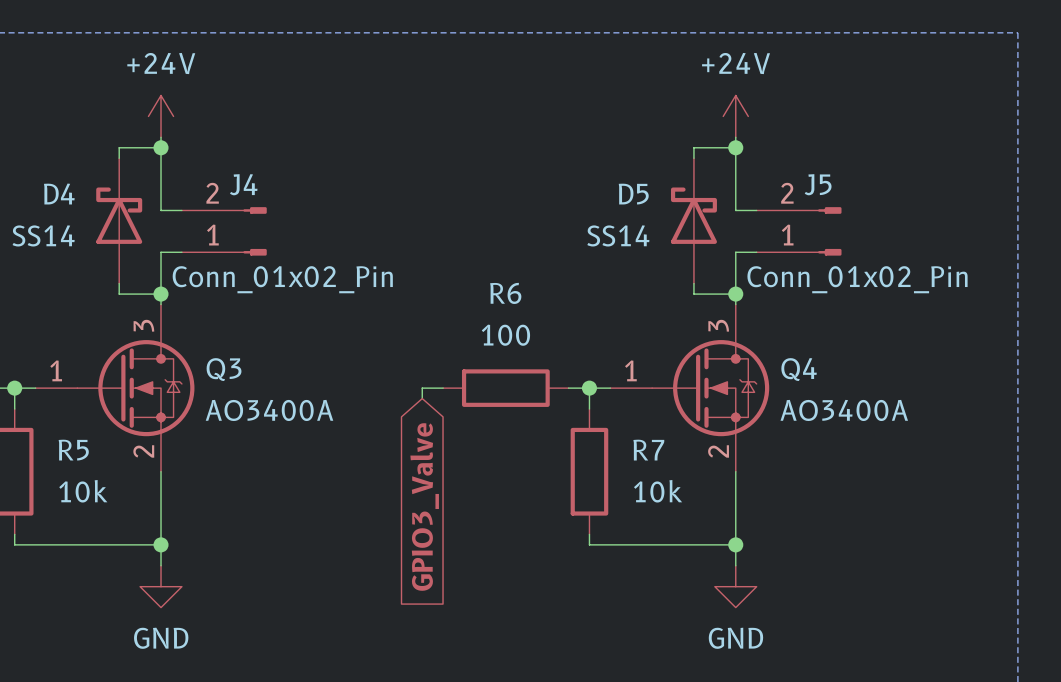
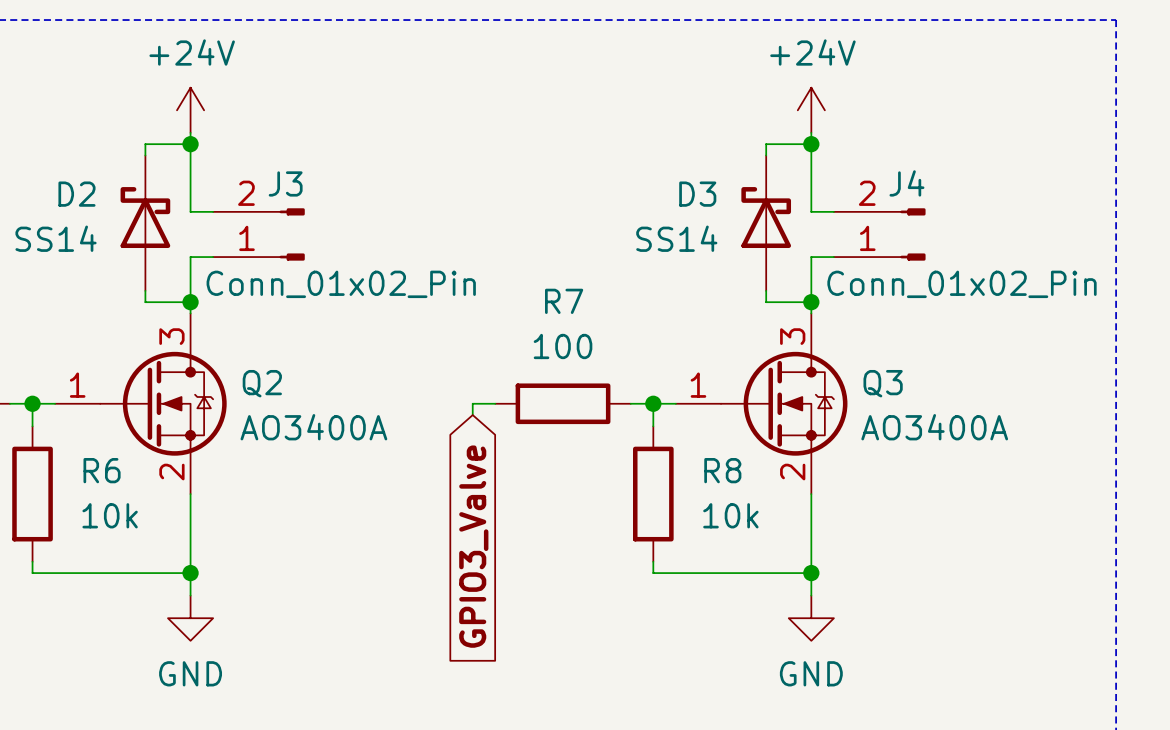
J4 name: J4 (243, 184) -> J3 (285, 183)
J5 name: J5 (818, 184) -> J4 (906, 183)
D4 name: D4 (59, 194) -> D2 (76, 194)
D5 name: D5 (633, 194) -> D3 (697, 194)
R6 name: R6 (505, 293) -> R7 (564, 301)
Q3 name: Q3 (224, 369) -> Q2 (262, 383)
Q4 name: Q4 (799, 369) -> Q3 (883, 383)
R5 name: R5 (73, 450) -> R6 (102, 470)
R7 name: R7 (648, 450) -> R8 (722, 470)

